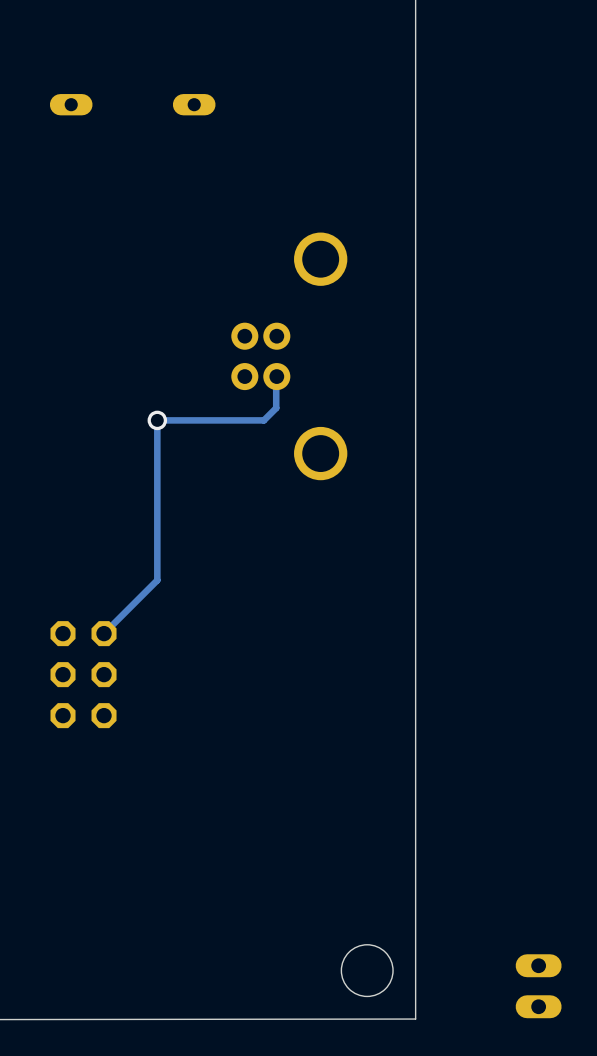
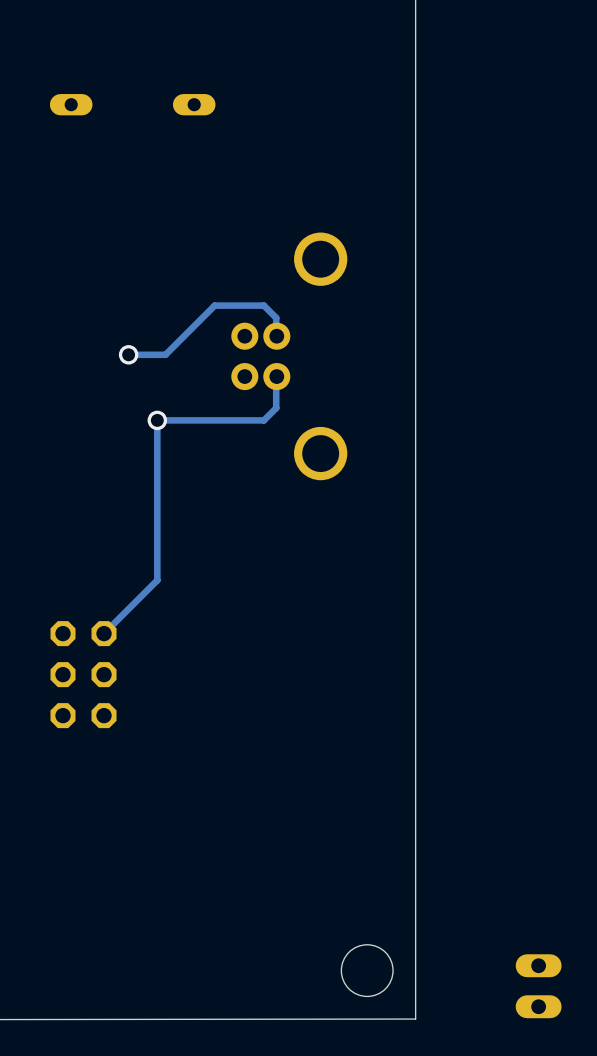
track: none -> (276, 336) (276, 317) (263, 305) (214, 305) (165, 354) (128, 354)
via: none -> (128, 354)

